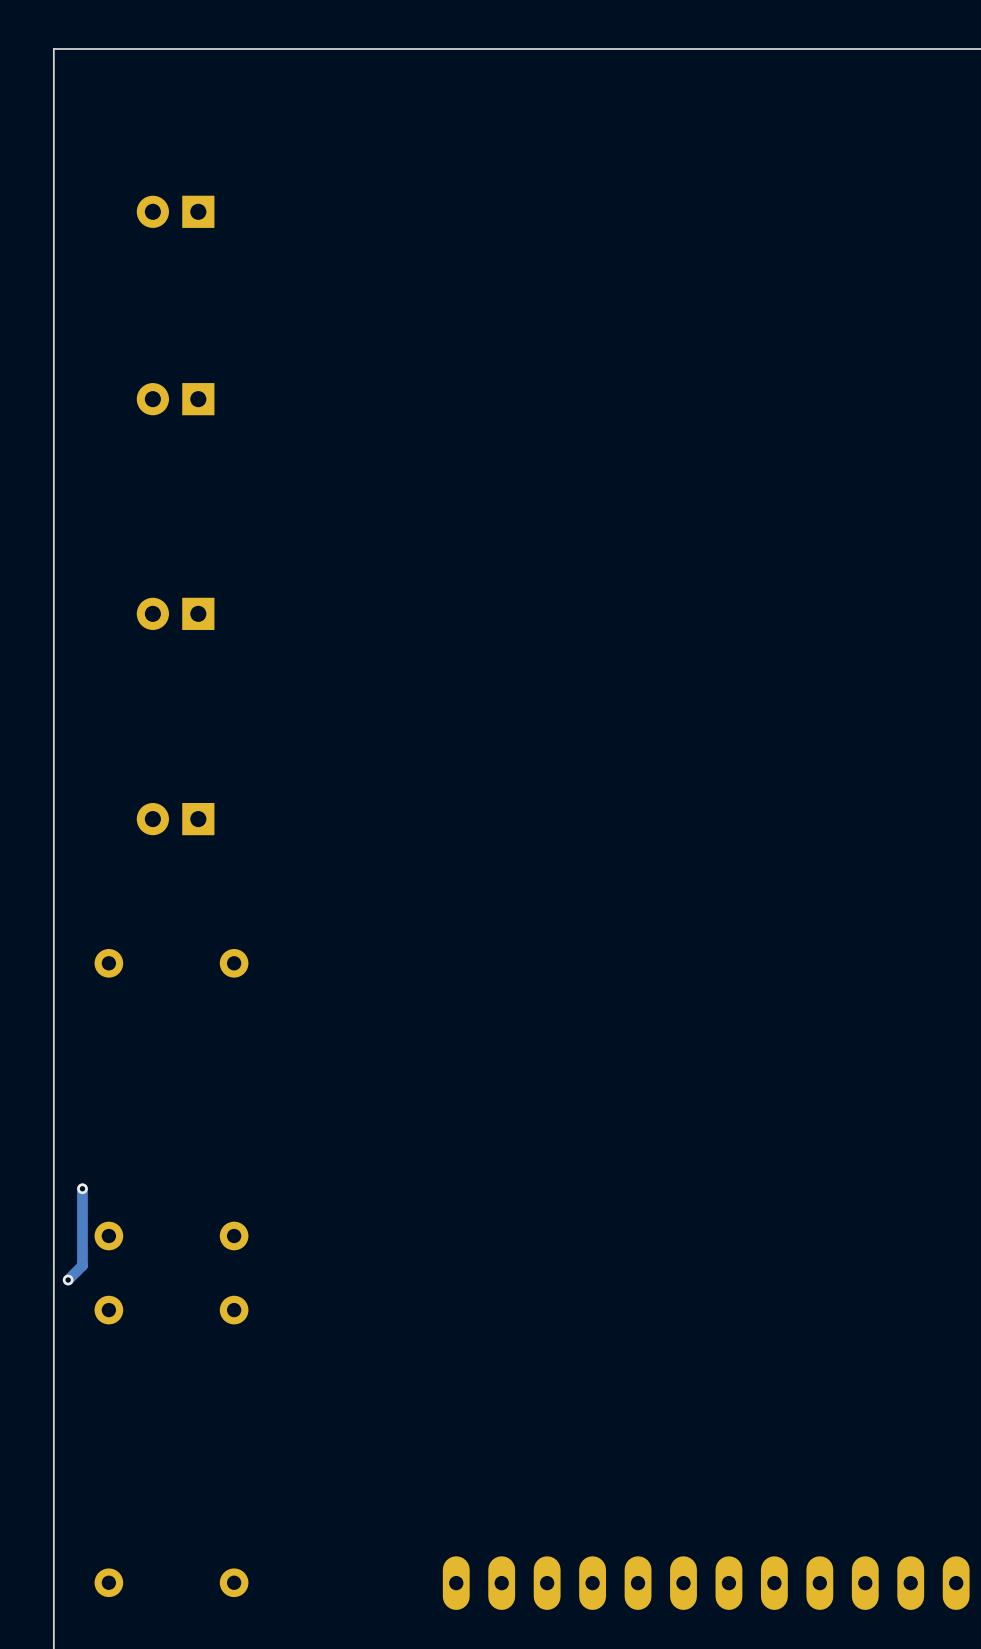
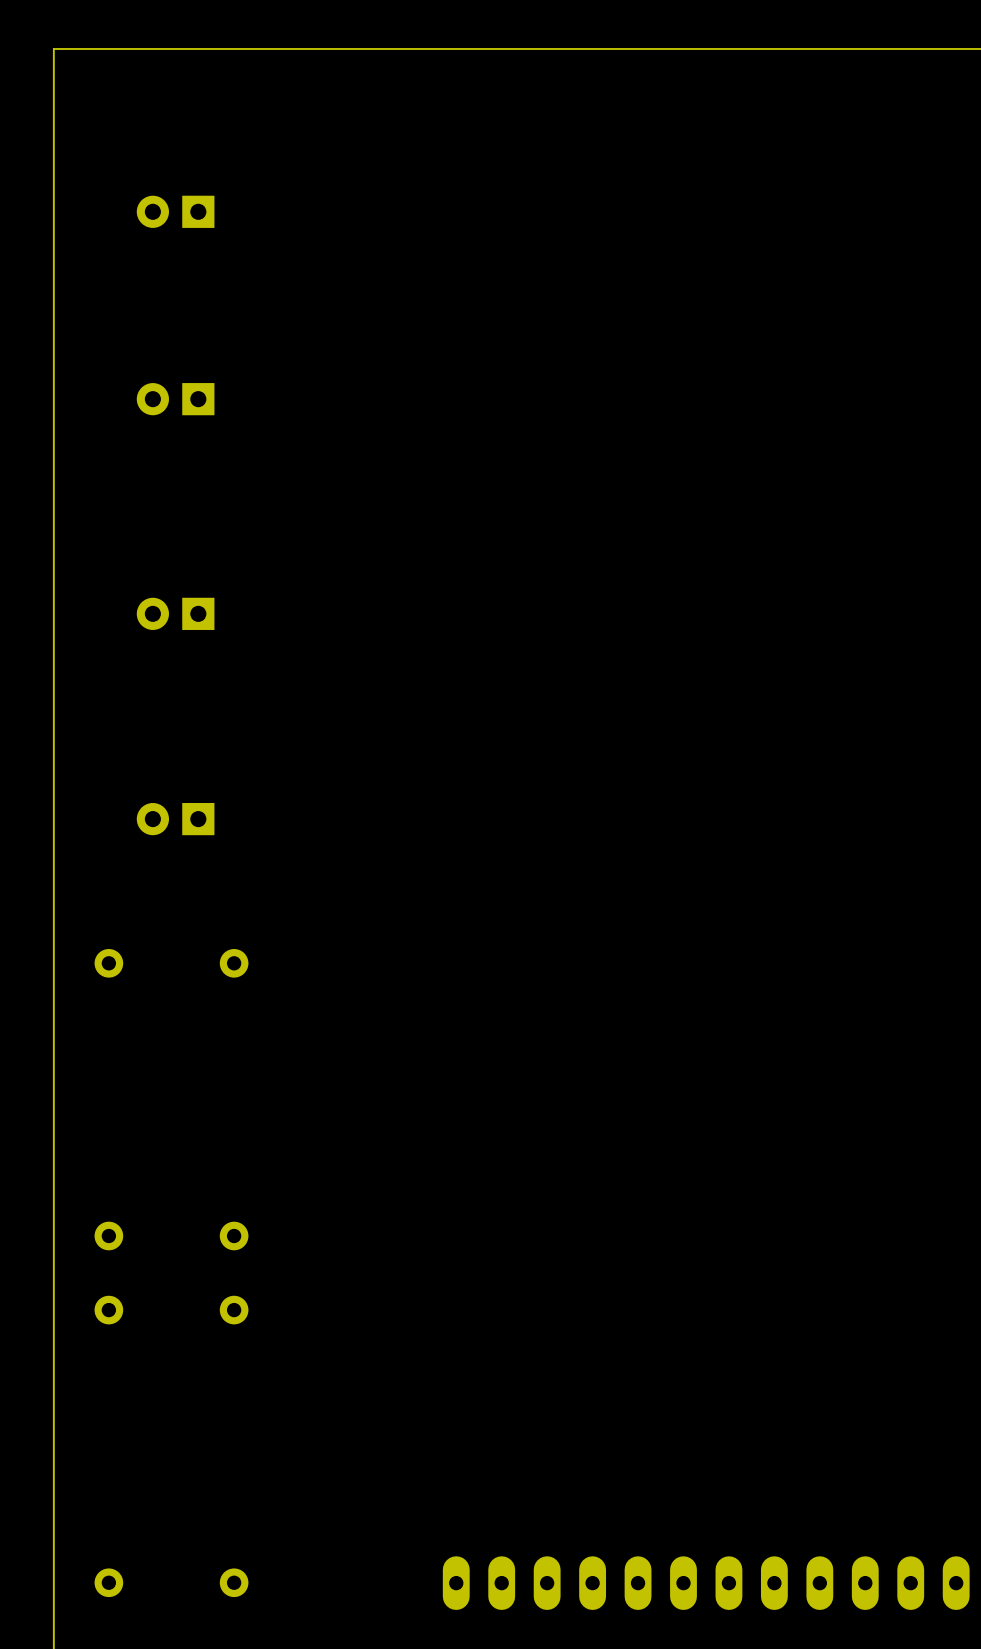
track: (82, 1188) (82, 1265) (68, 1280) -> none
via: (82, 1188) -> none
via: (68, 1280) -> none

